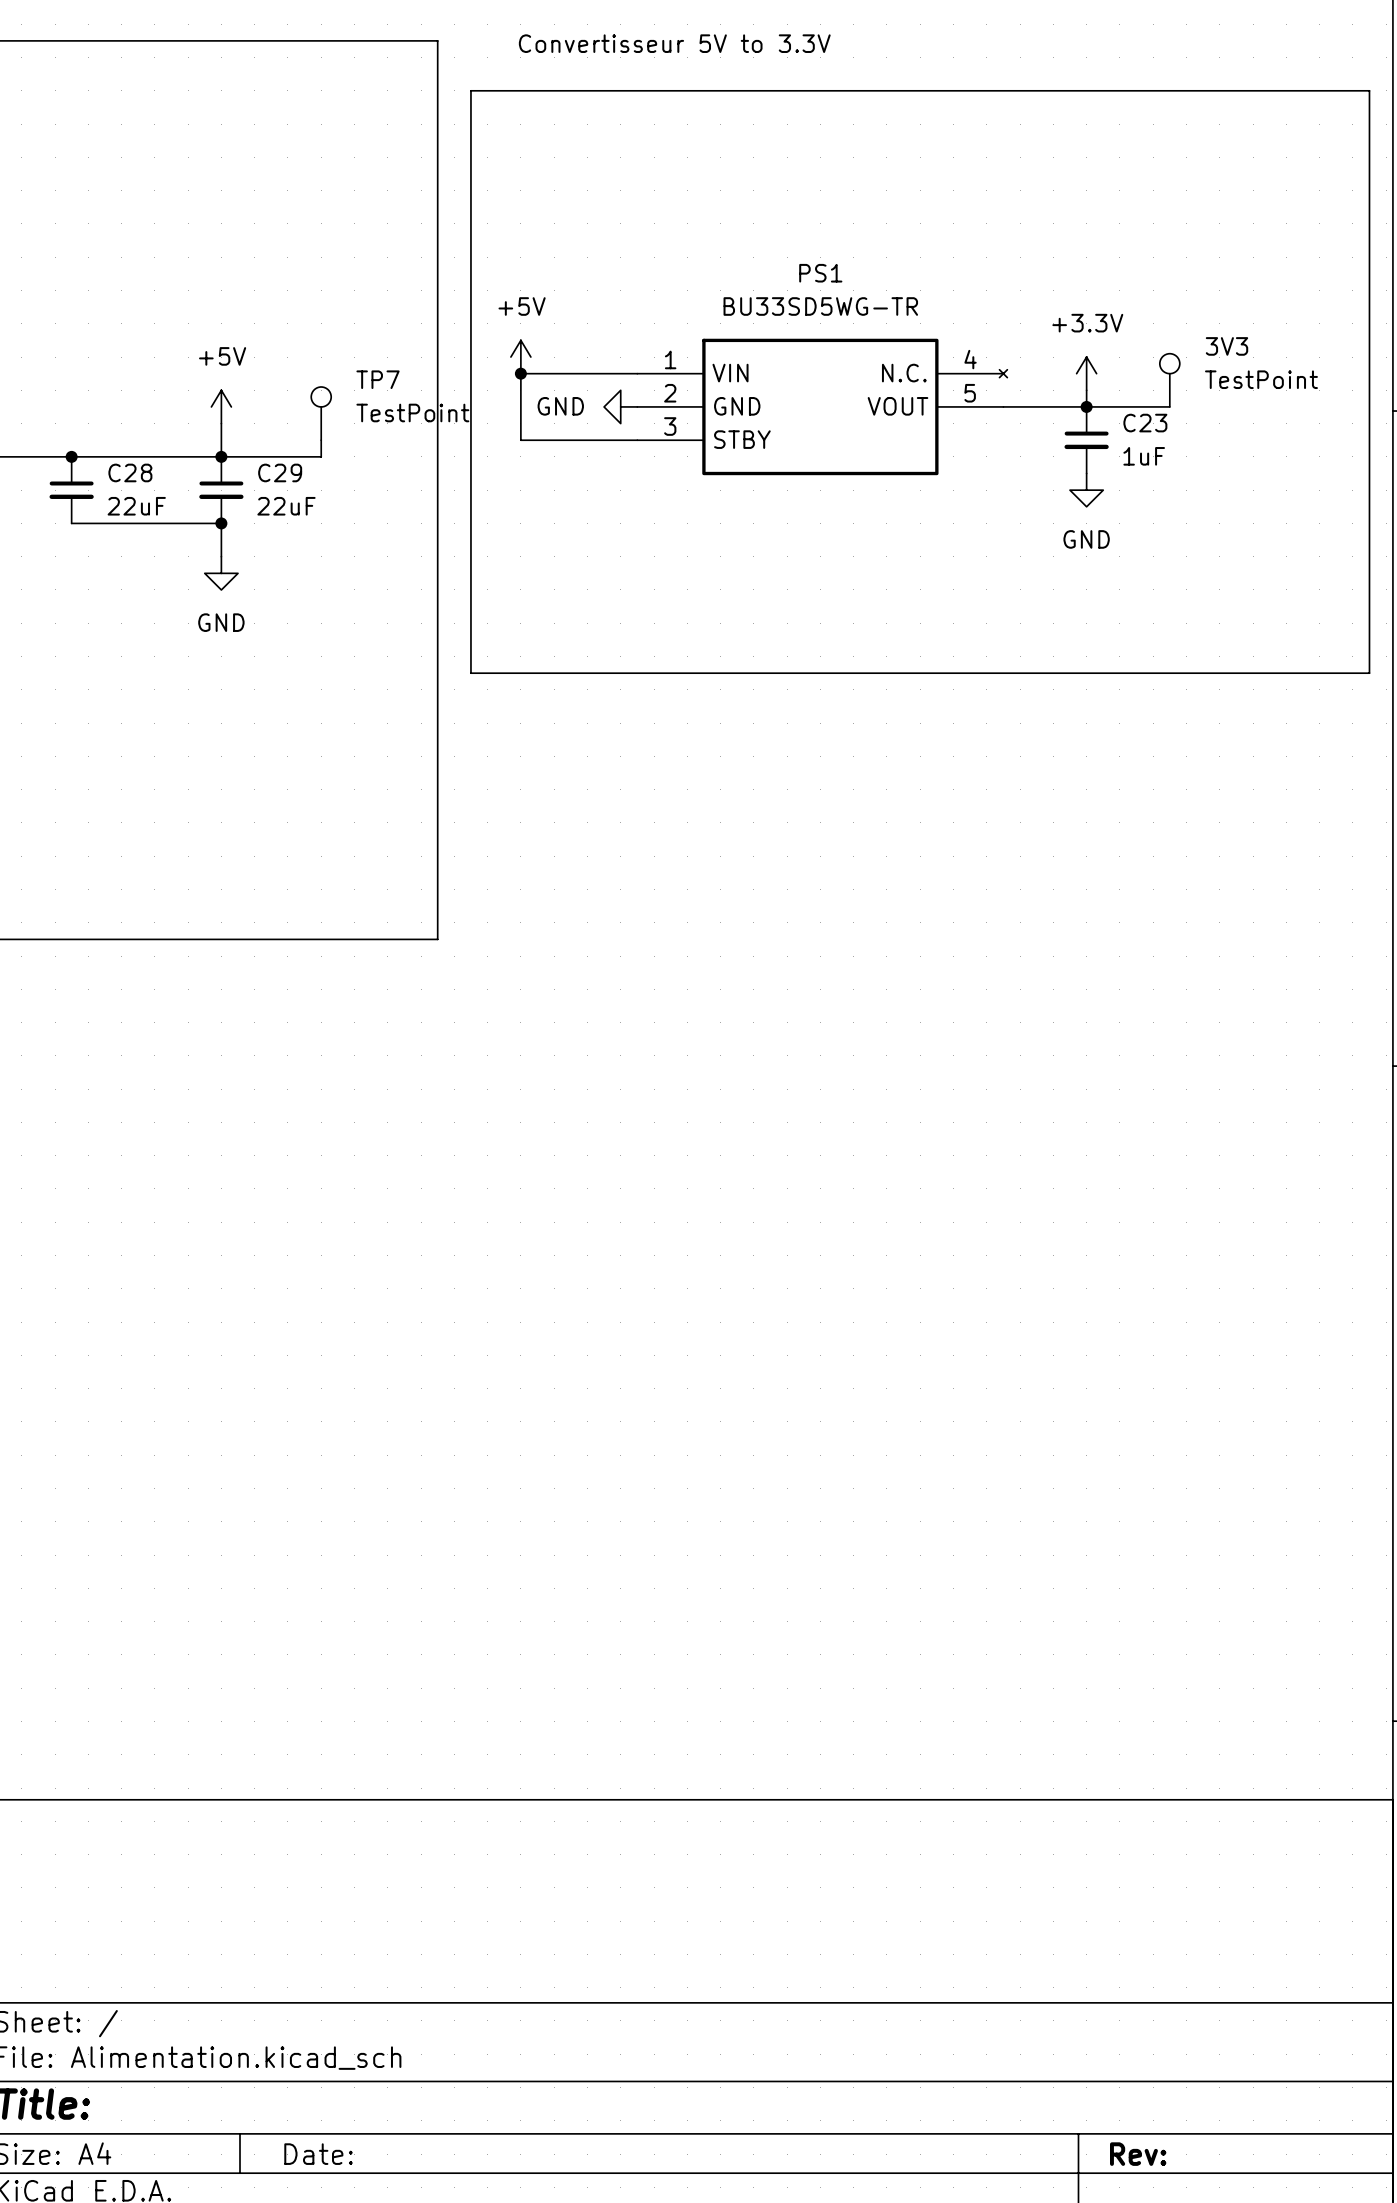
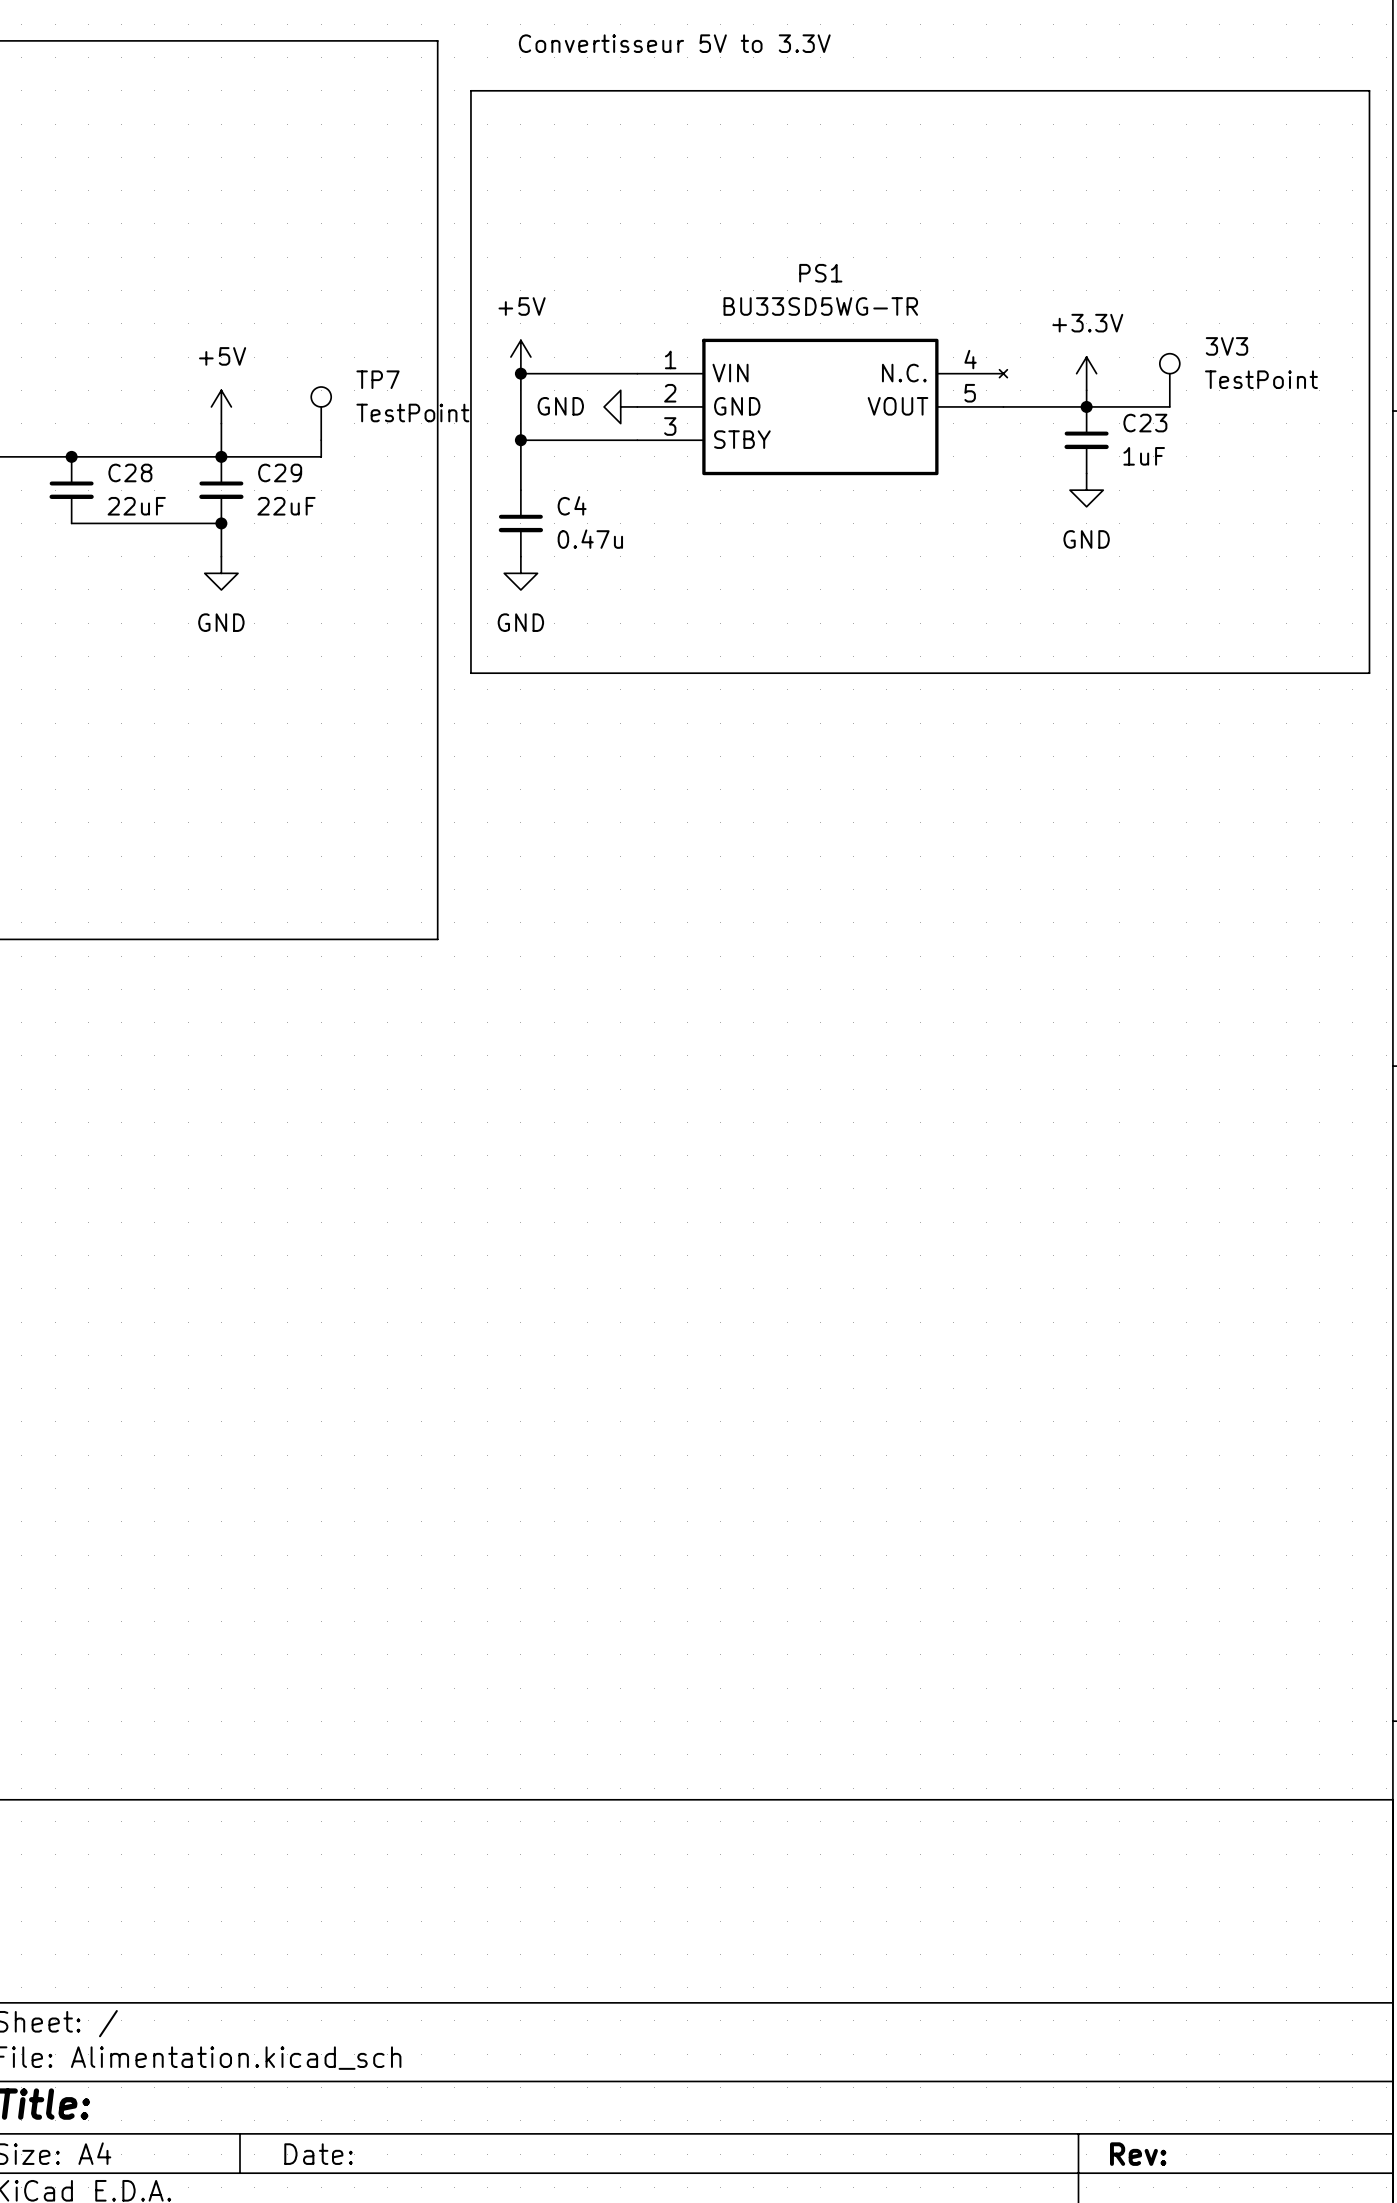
wire: none -> (520, 440) (520, 490)
junction: none -> (520, 440)
C4: none -> 0.47u (520, 523)
power symbol: none -> GND (520, 573)

